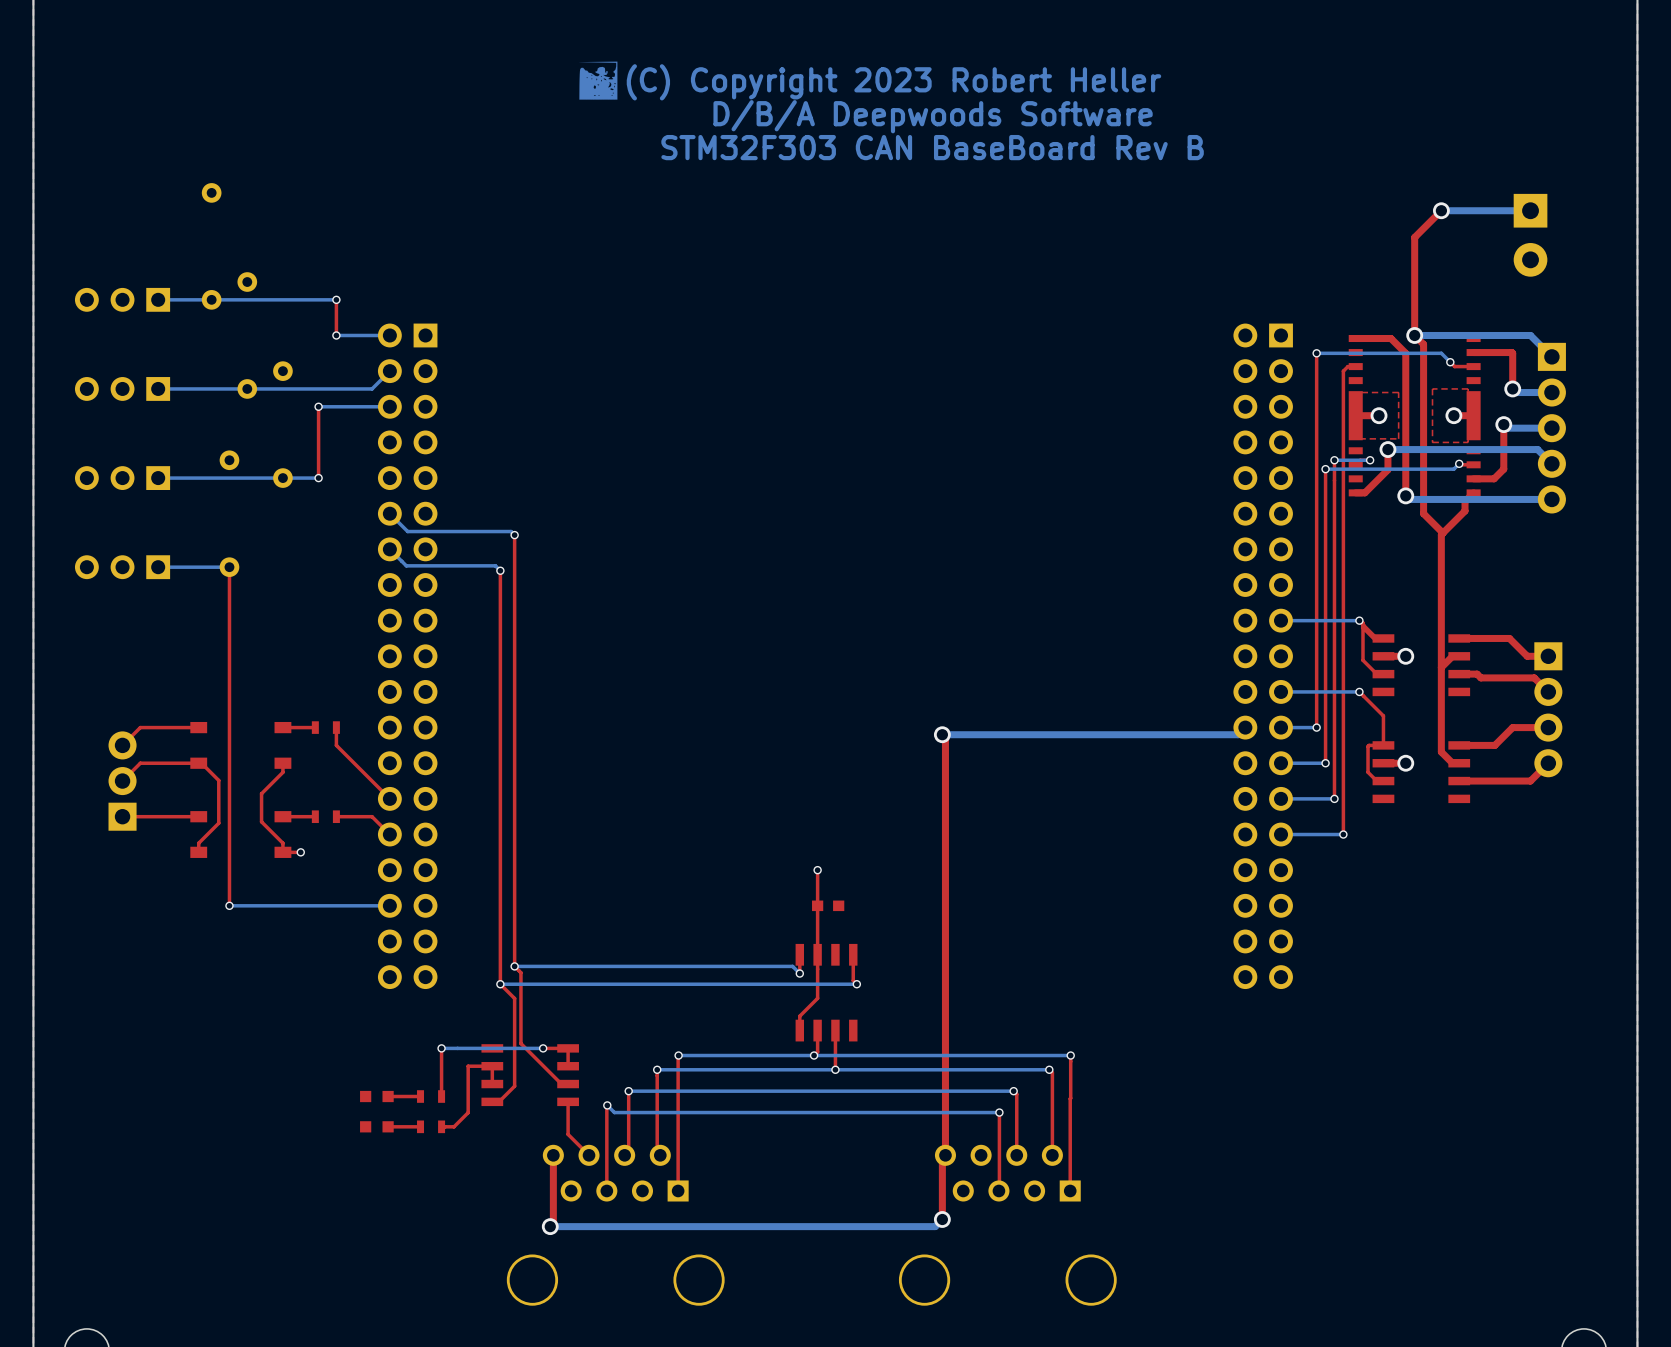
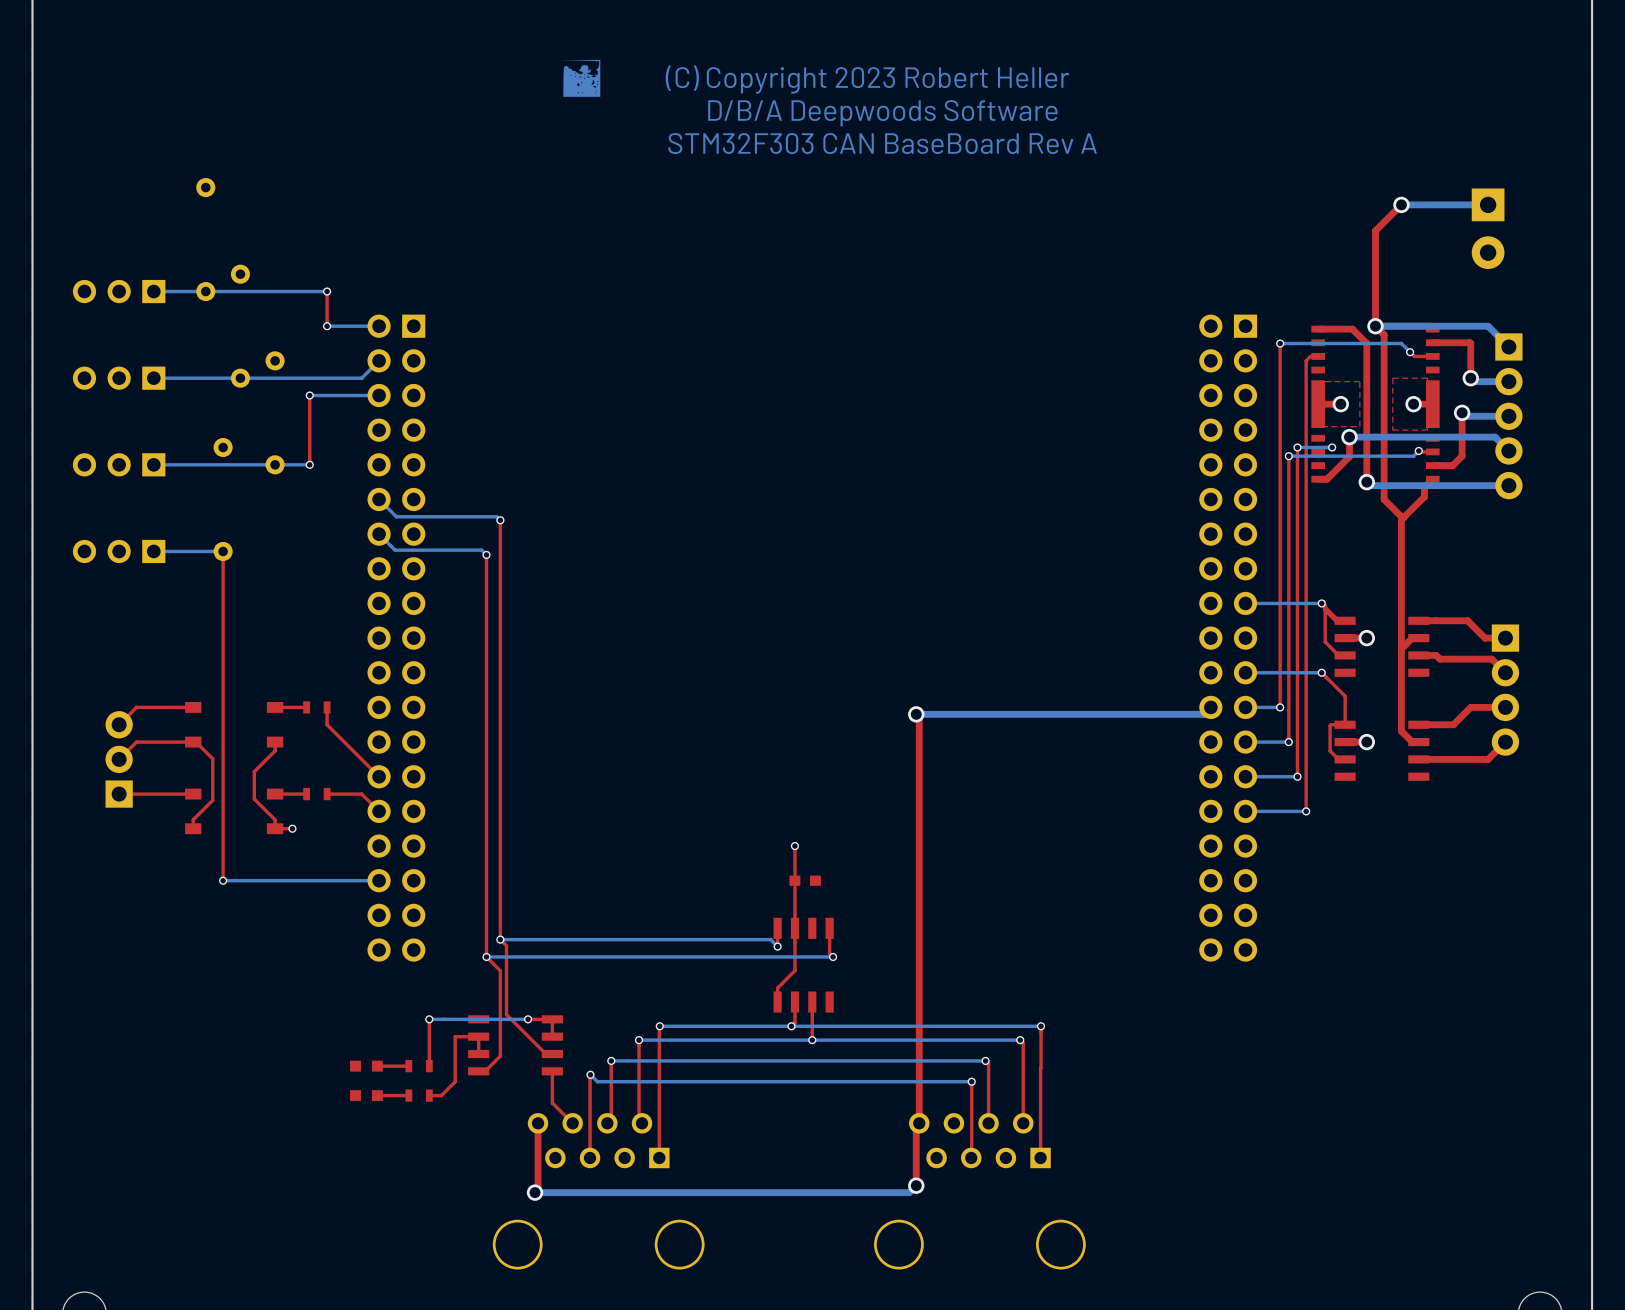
text: STM32F303 CAN BaseBoard Rev B (932, 147) -> STM32F303 CAN BaseBoard Rev A (882, 143)

